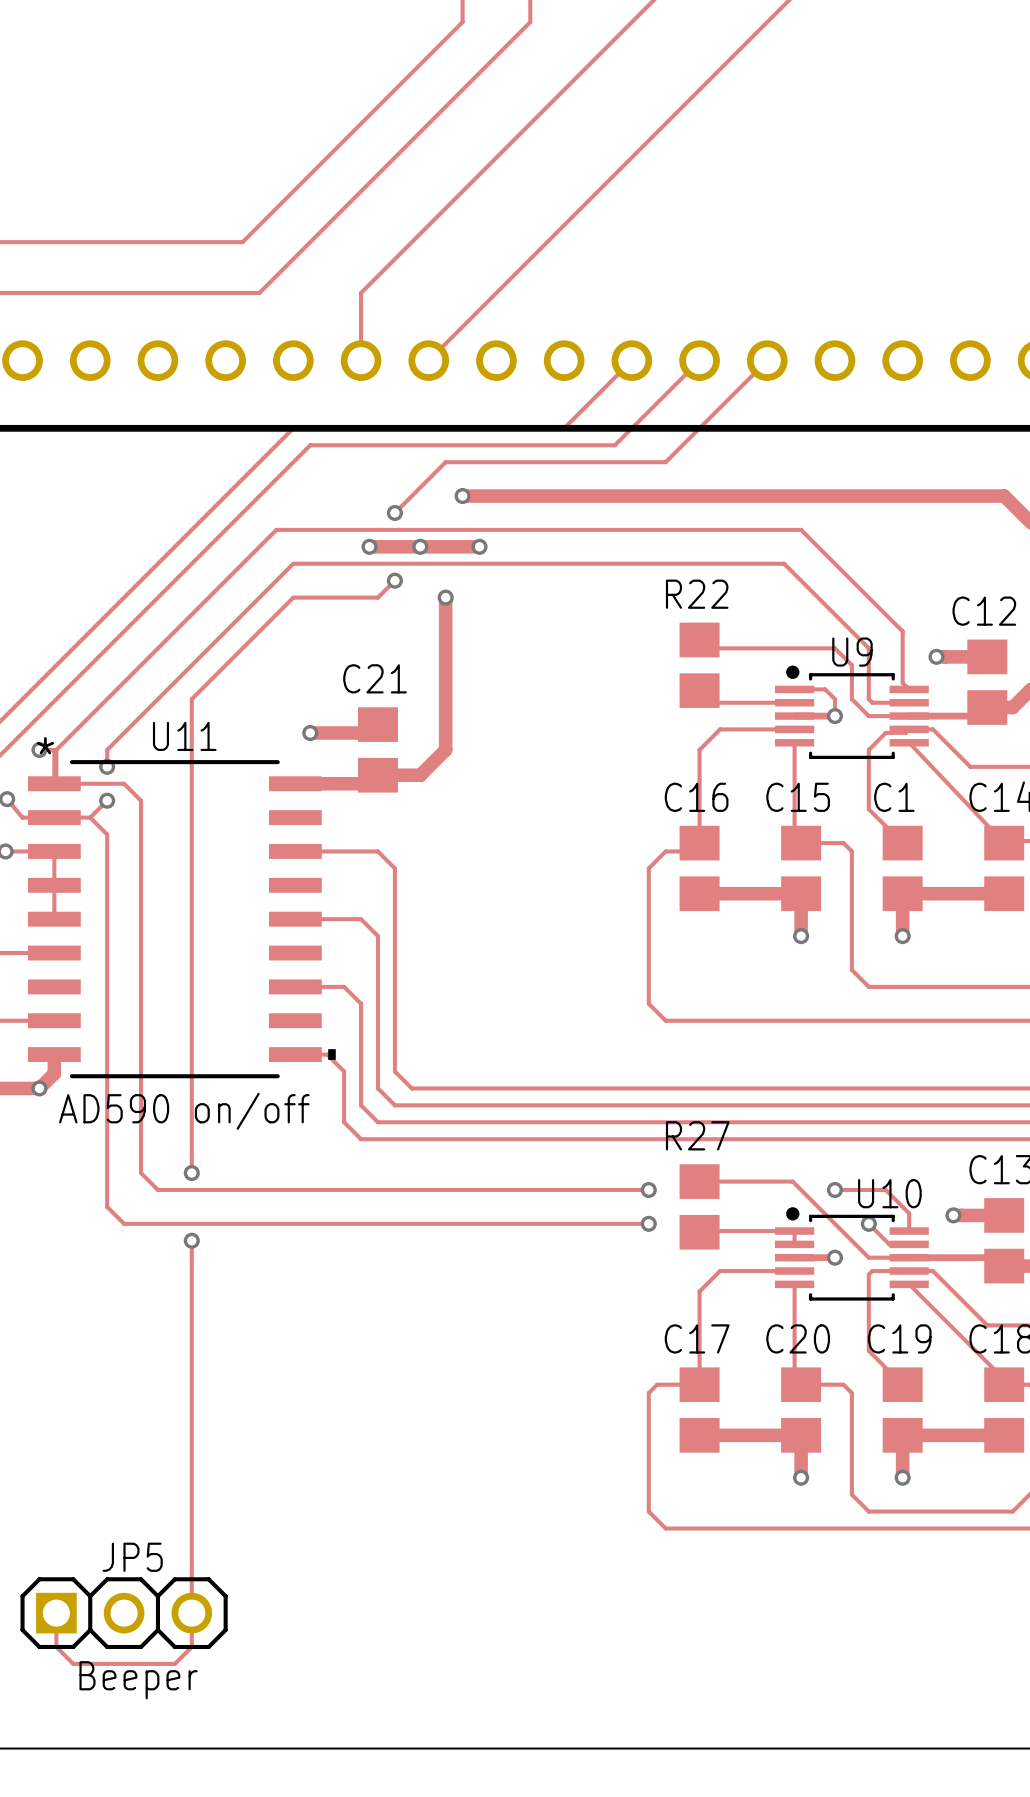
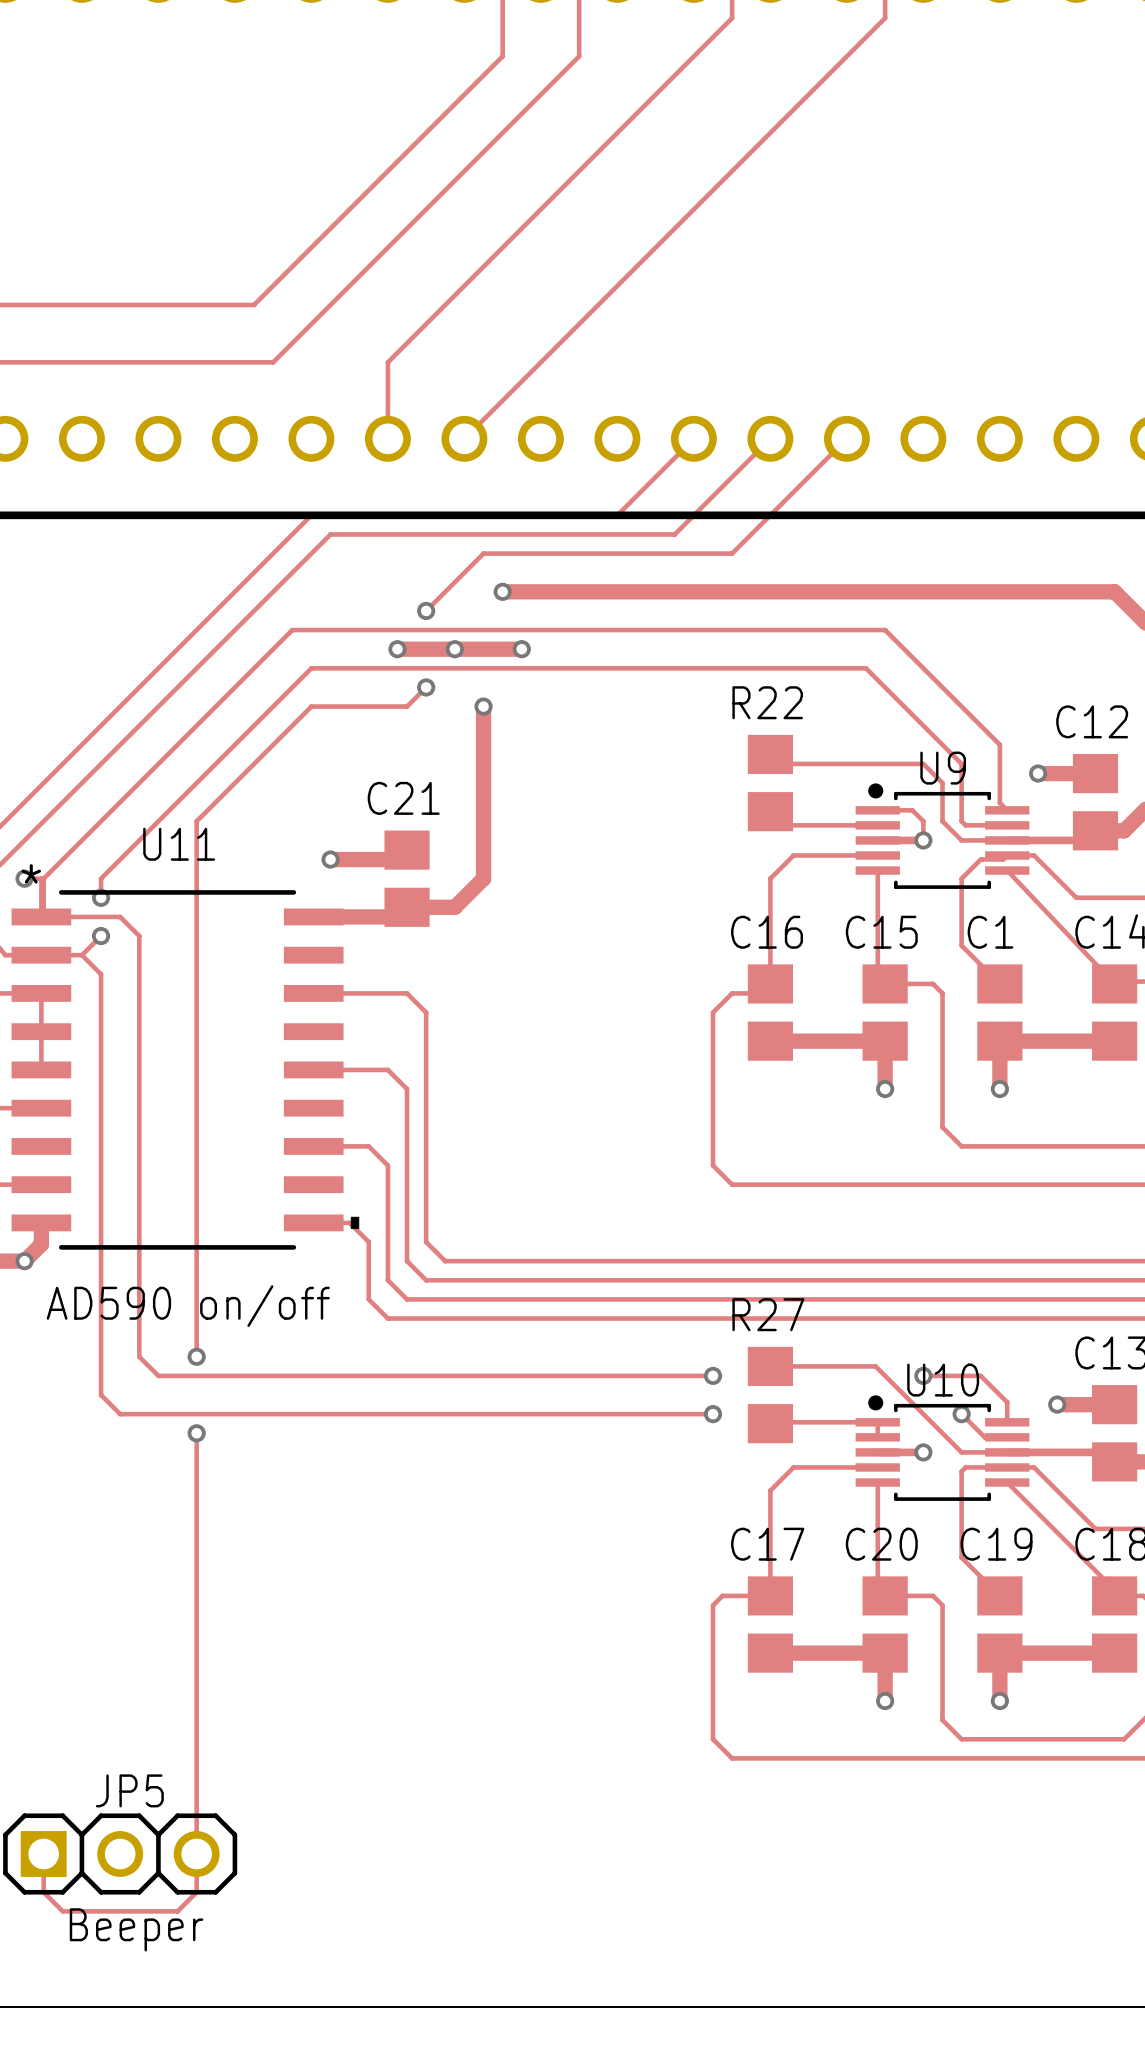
U11 name position: U11 (184, 736) -> U11 (179, 844)
text position: AD590 on/off (184, 1111) -> AD590 on/off (188, 1306)
U10 name position: U10 (889, 1193) -> U10 (943, 1380)

